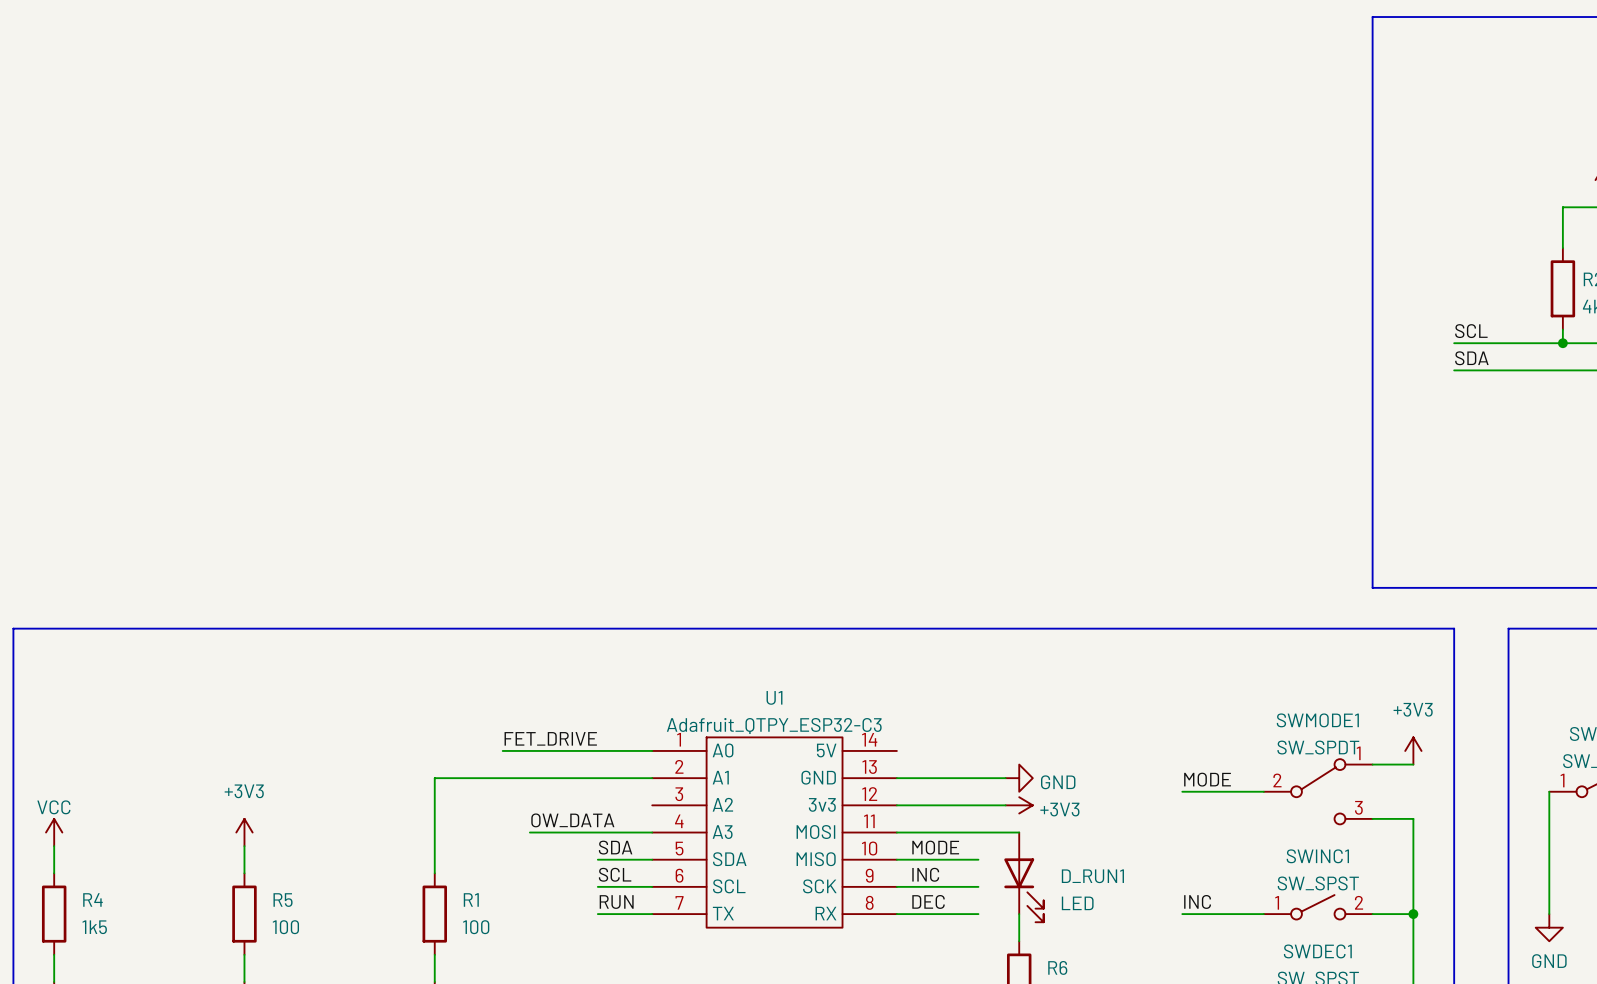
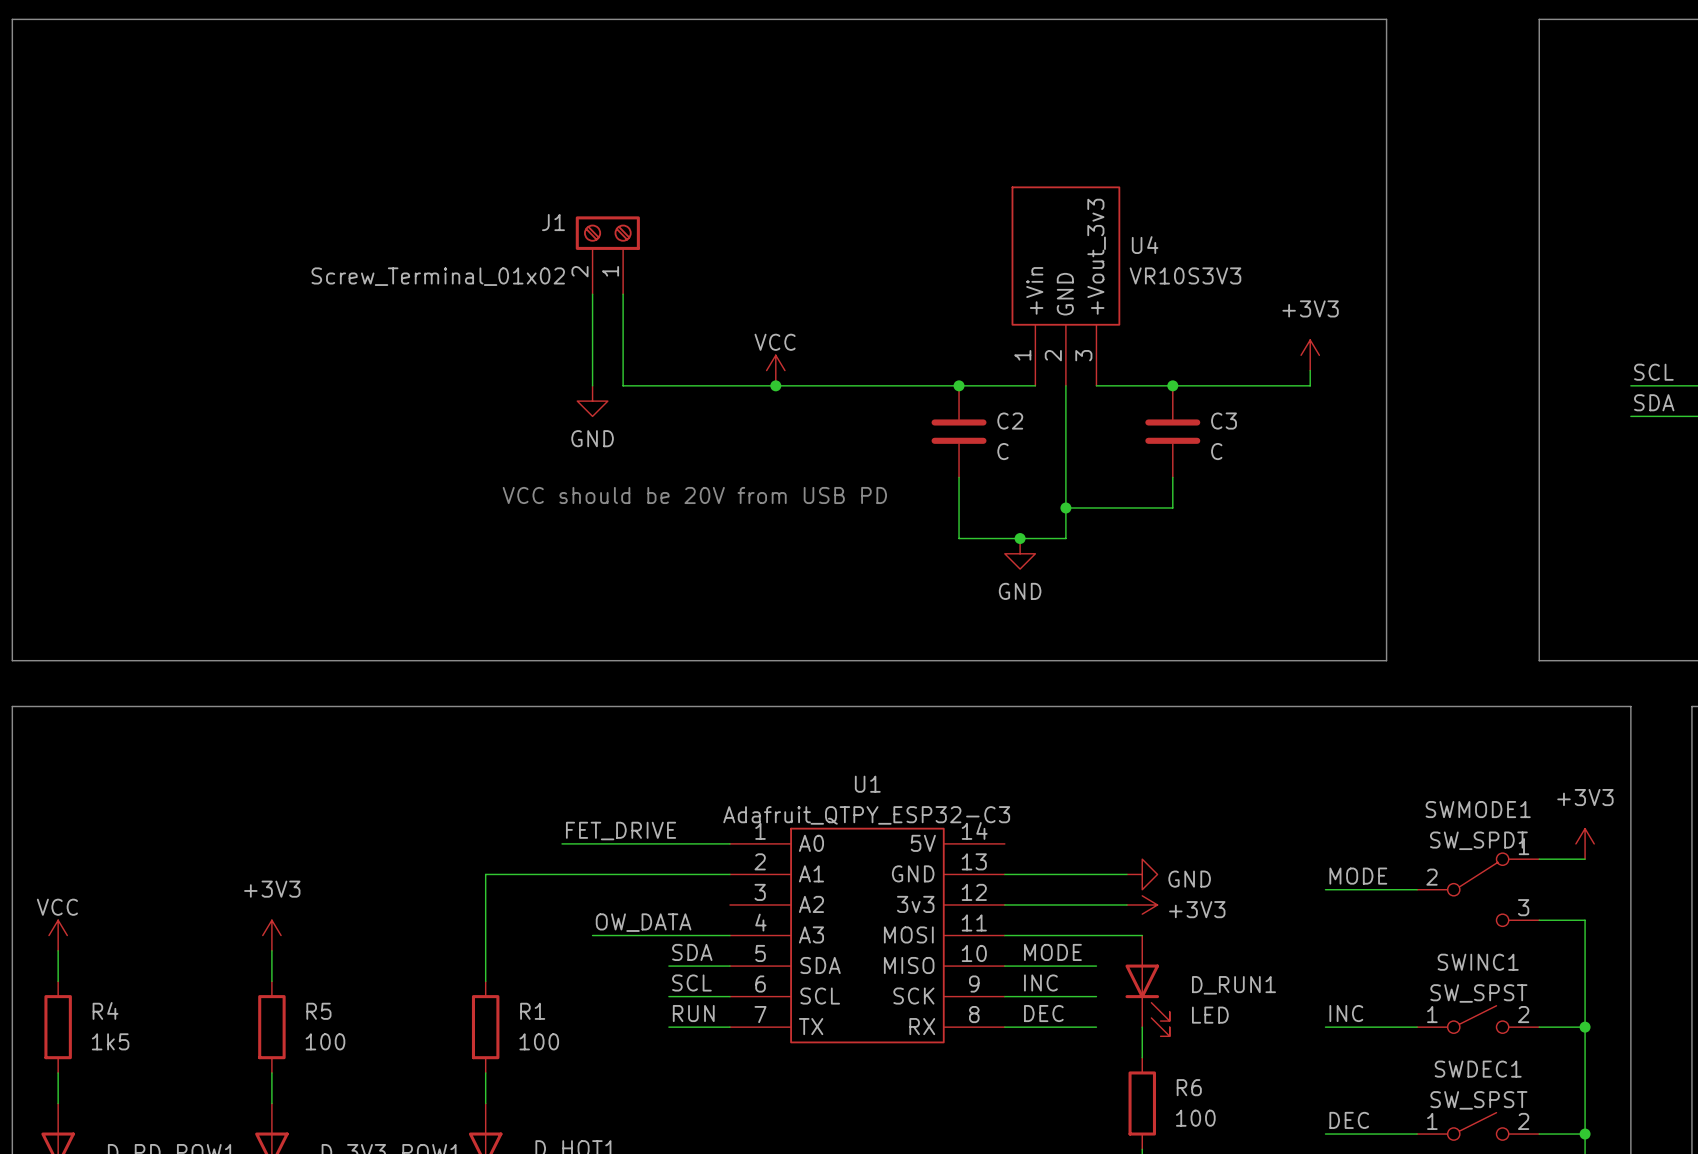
line: none -> (12, 19) (12, 660) (1386, 660) (1386, 19) (12, 19)
J1: none -> Screw_Terminal_01x02 (607, 255)
U4: none -> VR10S3V3 (1065, 286)
wire: none -> (592, 294) (592, 385)
wire: none -> (623, 294) (623, 385) (1035, 385)
power symbol: none -> +3V3 (1310, 355)
power symbol: none -> VCC (775, 370)
wire: none -> (1310, 370) (1310, 385) (1096, 385)
junction: none -> (775, 385)
junction: none -> (959, 385)
wire: none -> (1065, 385) (1065, 538) (959, 538) (959, 477)
junction: none -> (1172, 385)
power symbol: none -> GND (592, 401)
C2: none -> C (959, 431)
C3: none -> C (1172, 431)
wire: none -> (1172, 477) (1172, 507) (1065, 507)
text: none -> VCC should be 20V from USB PD (694, 495)
junction: none -> (1065, 507)
junction: none -> (1020, 538)
power symbol: none -> GND (1020, 553)

